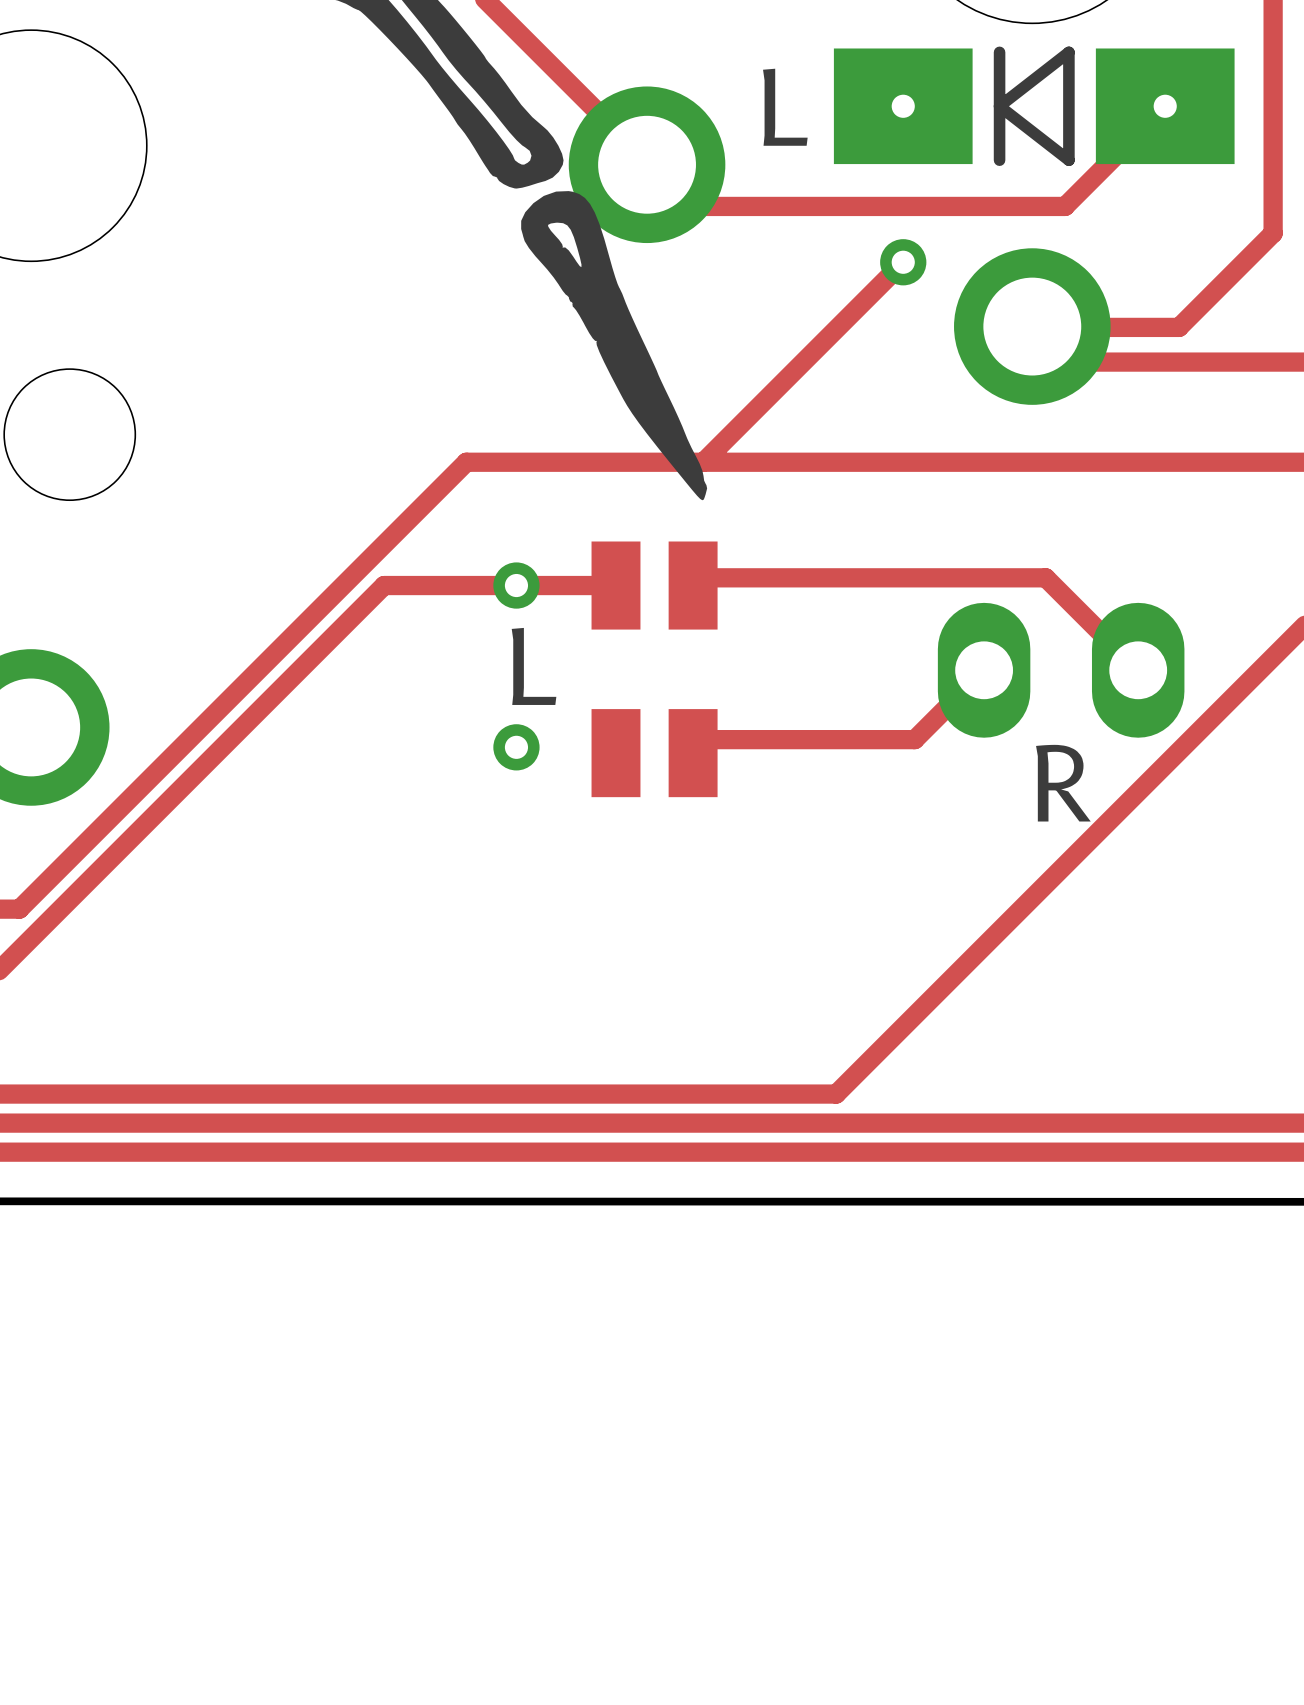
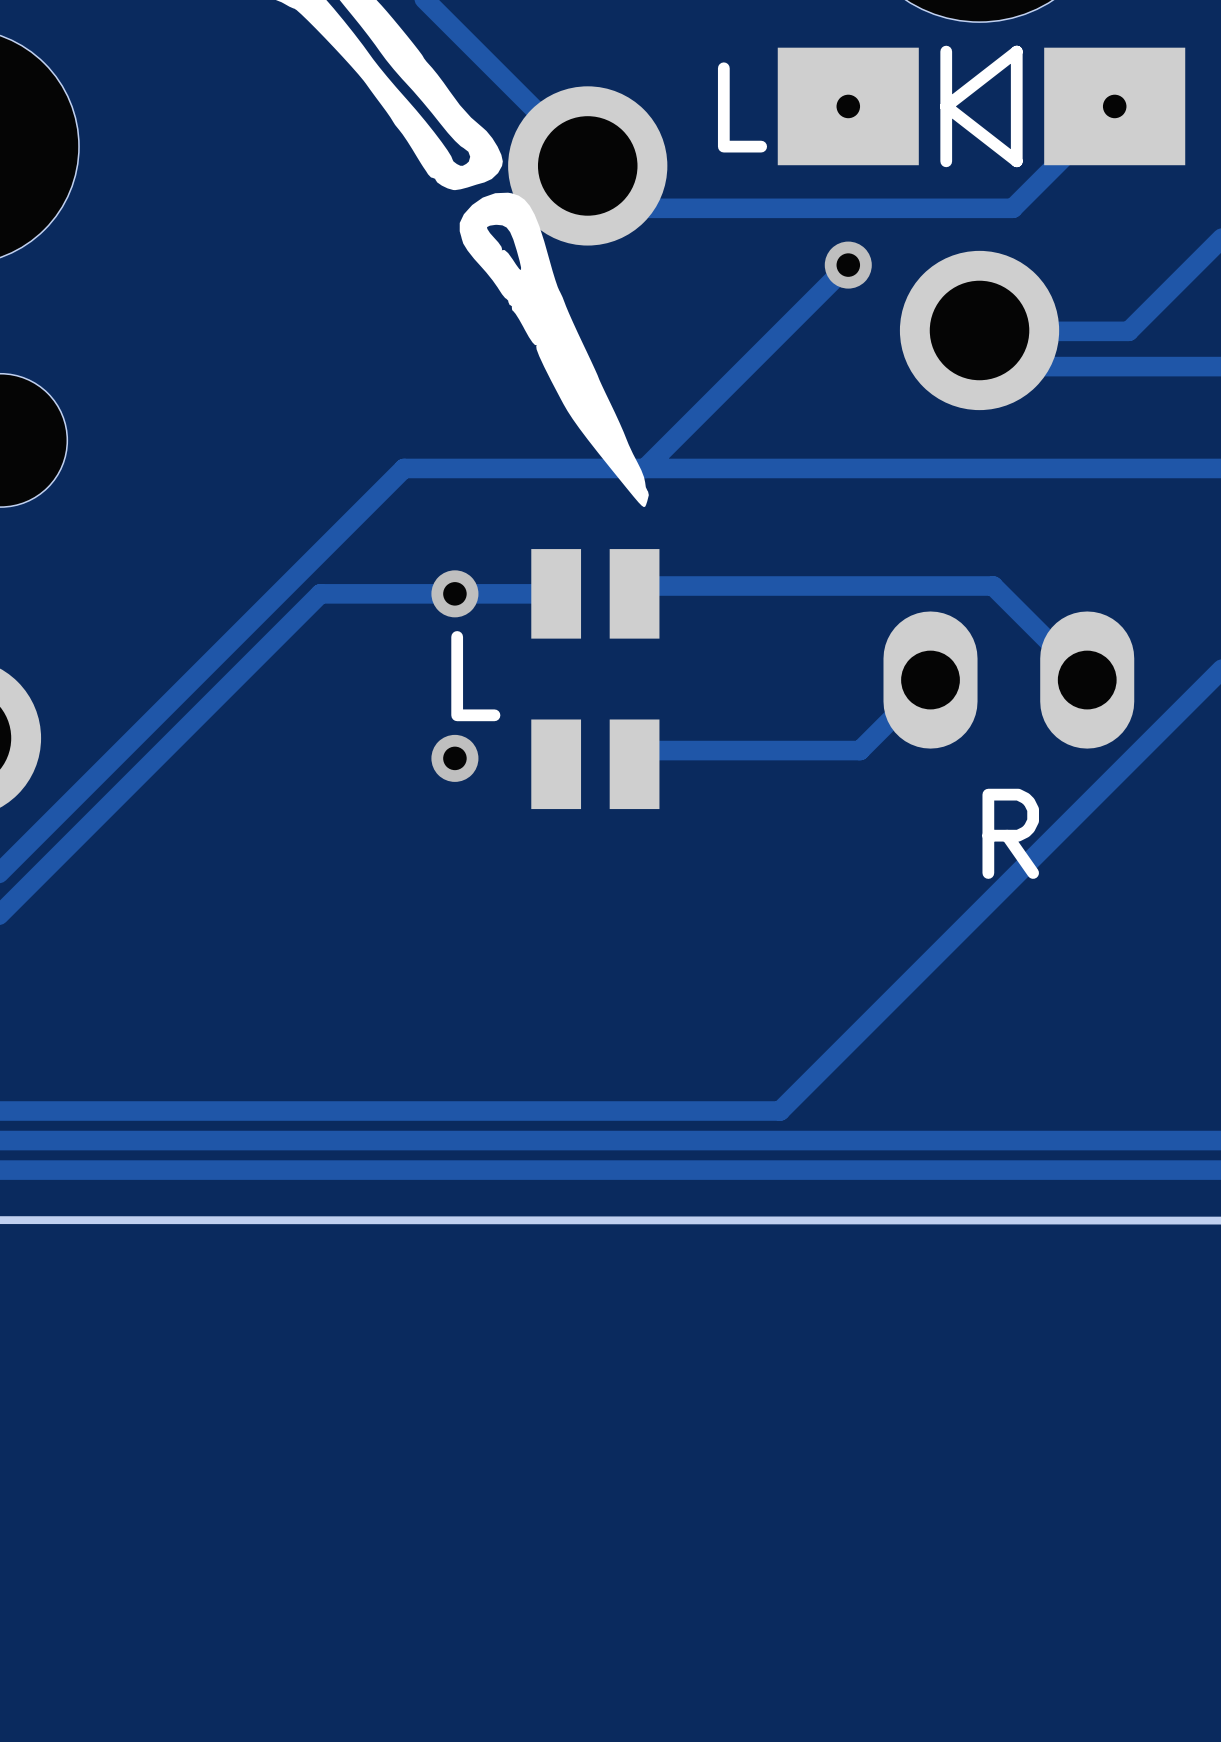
part text position: R (1063, 783) -> R (1010, 833)

